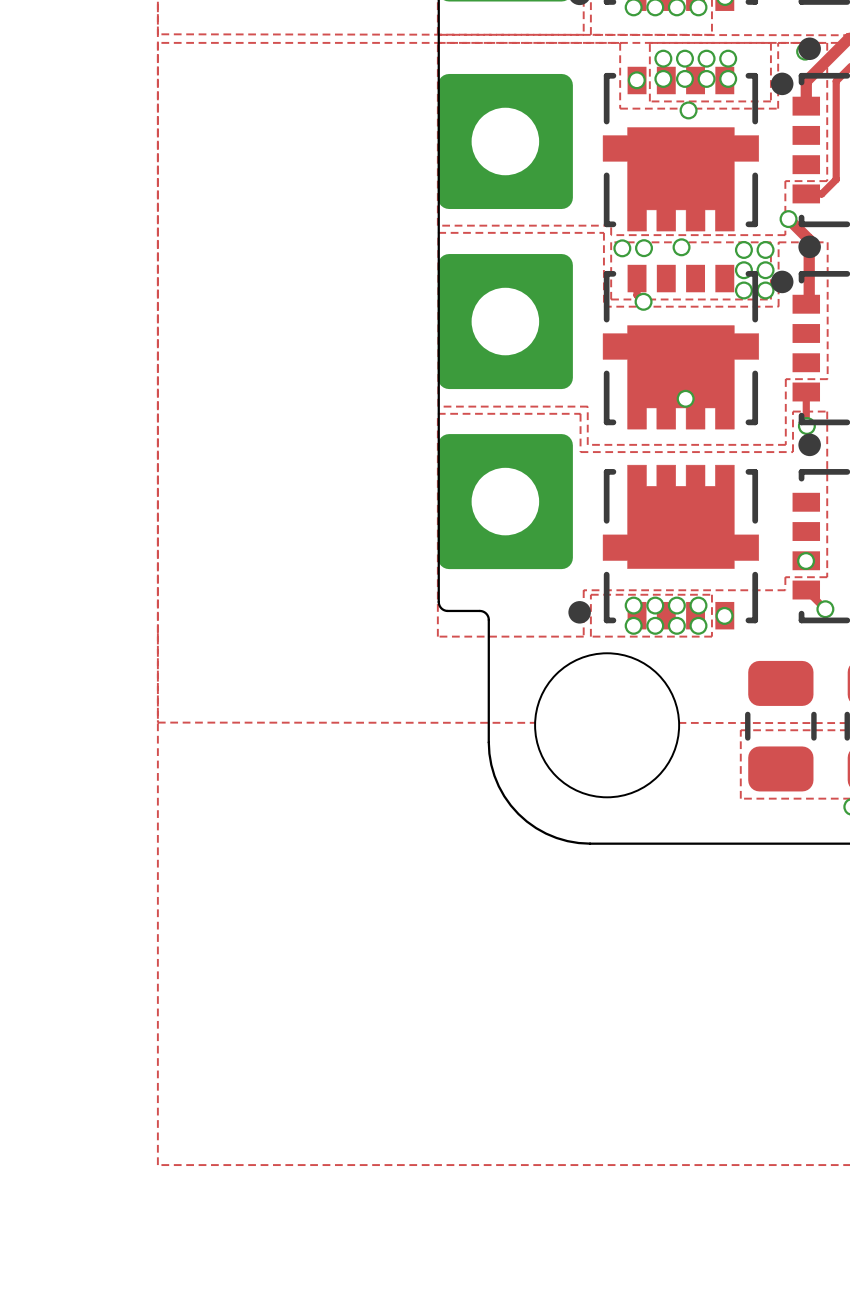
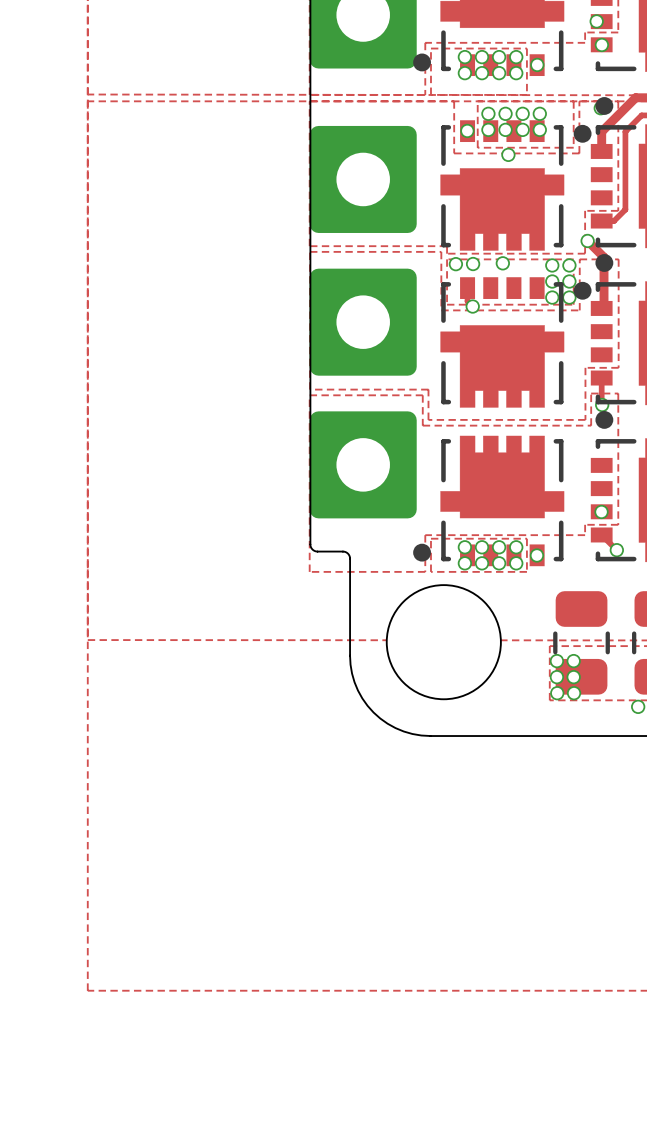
via: (685, 398) -> none
via: none -> (556, 661)
via: none -> (573, 661)
via: none -> (556, 677)
via: none -> (573, 677)
via: none -> (557, 693)
via: none -> (574, 693)

